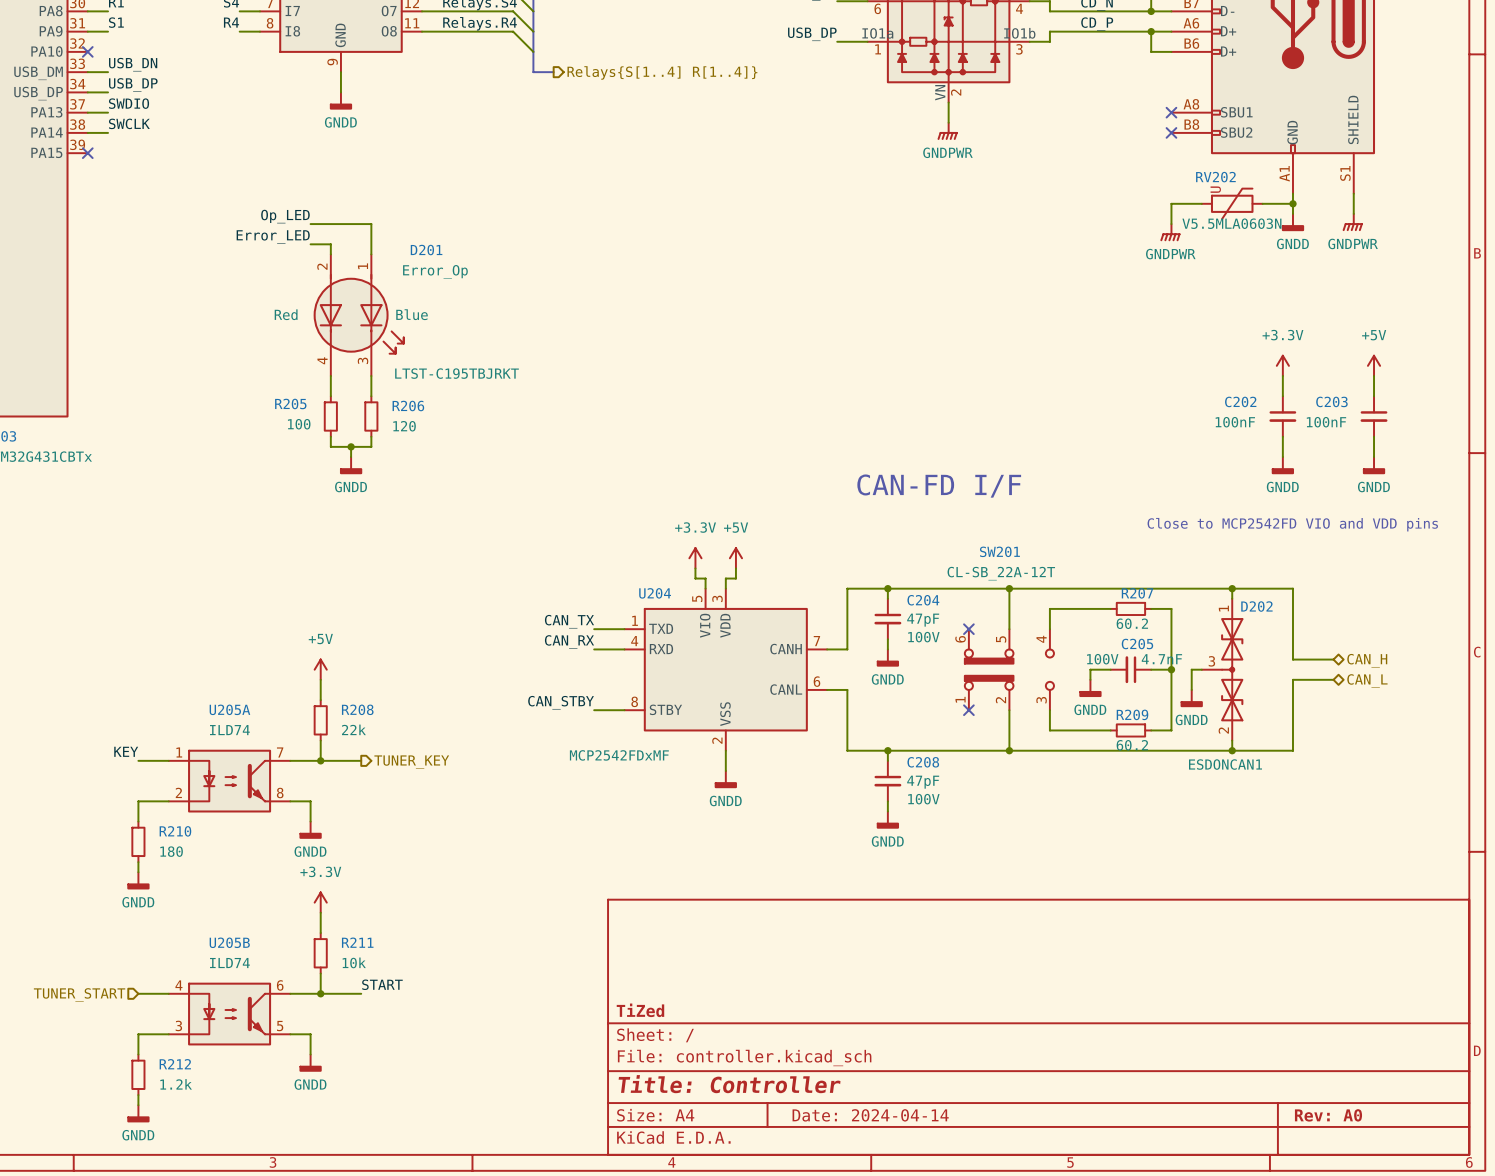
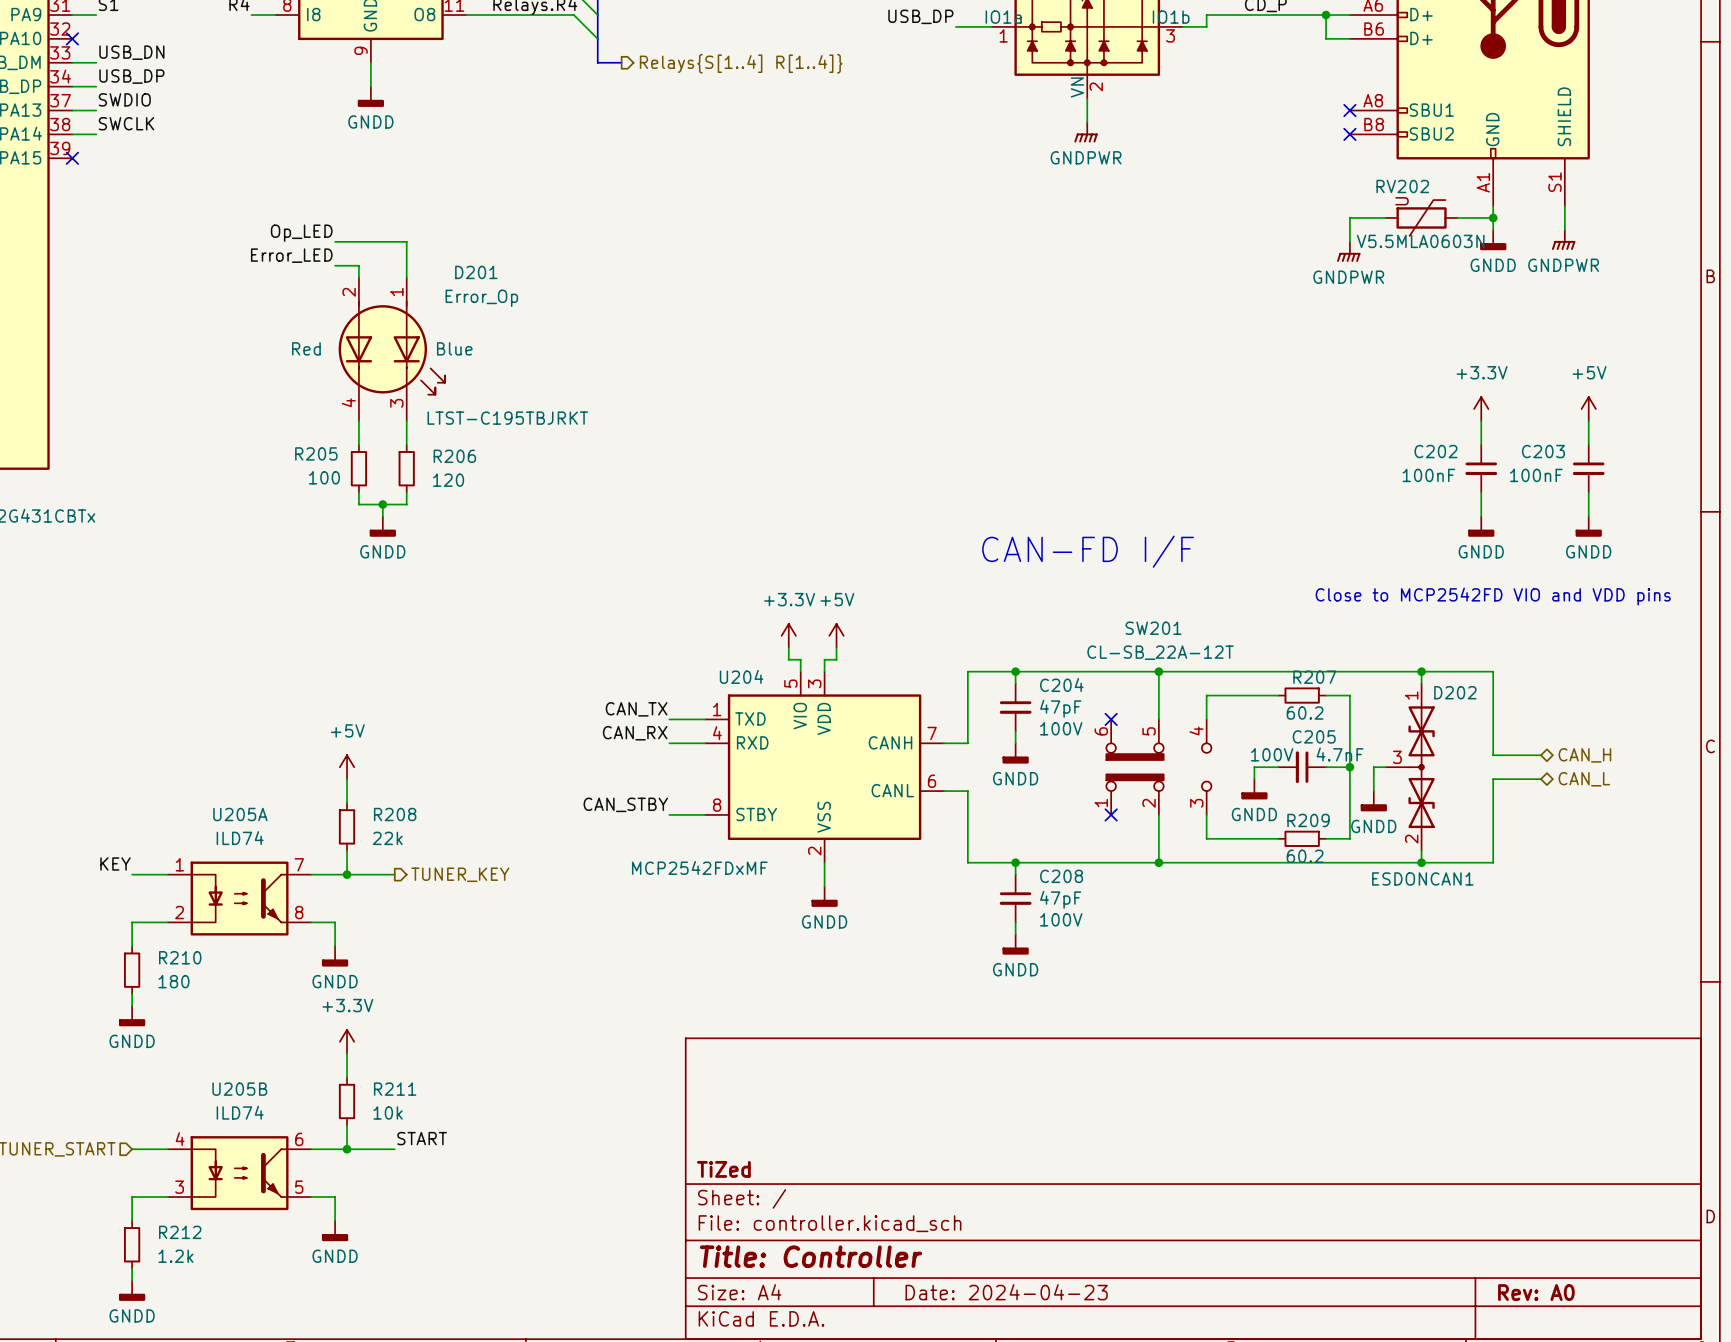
title block: Date: 2024-04-14 (870, 1115) -> Date: 2024-04-23 (1006, 1292)

